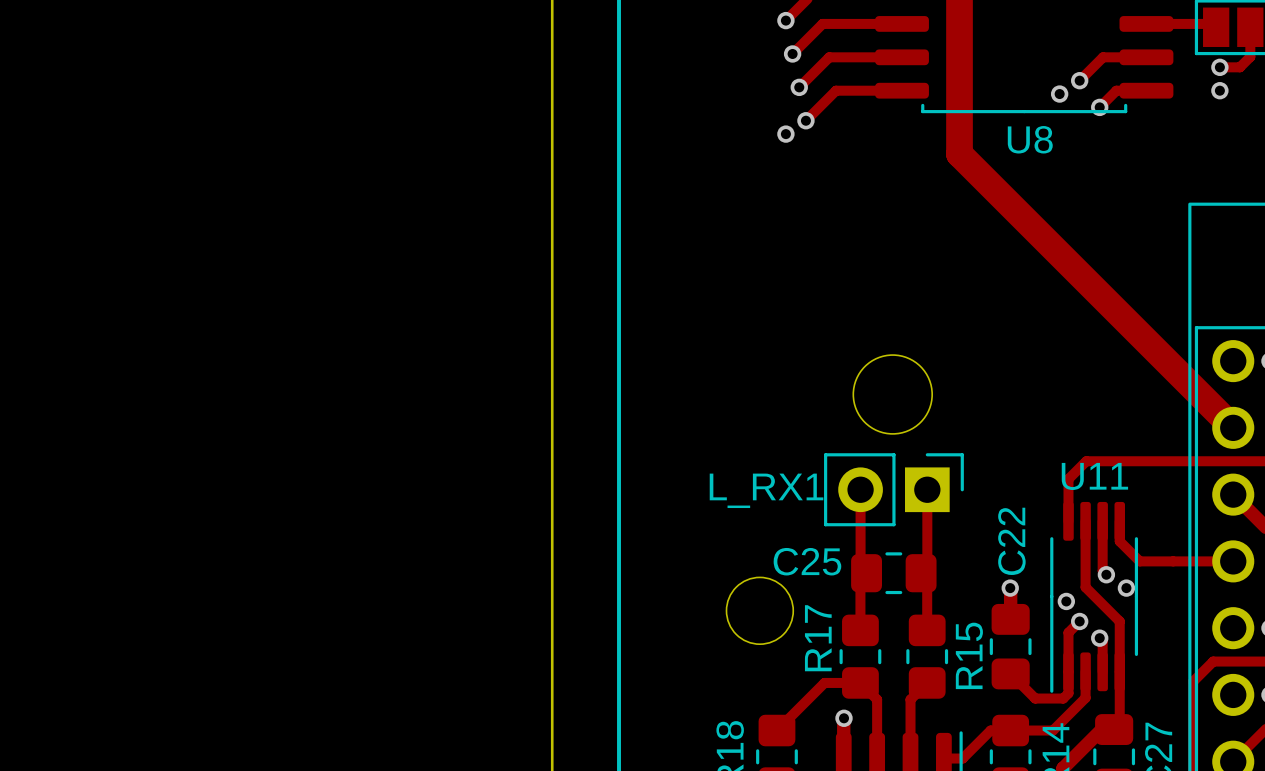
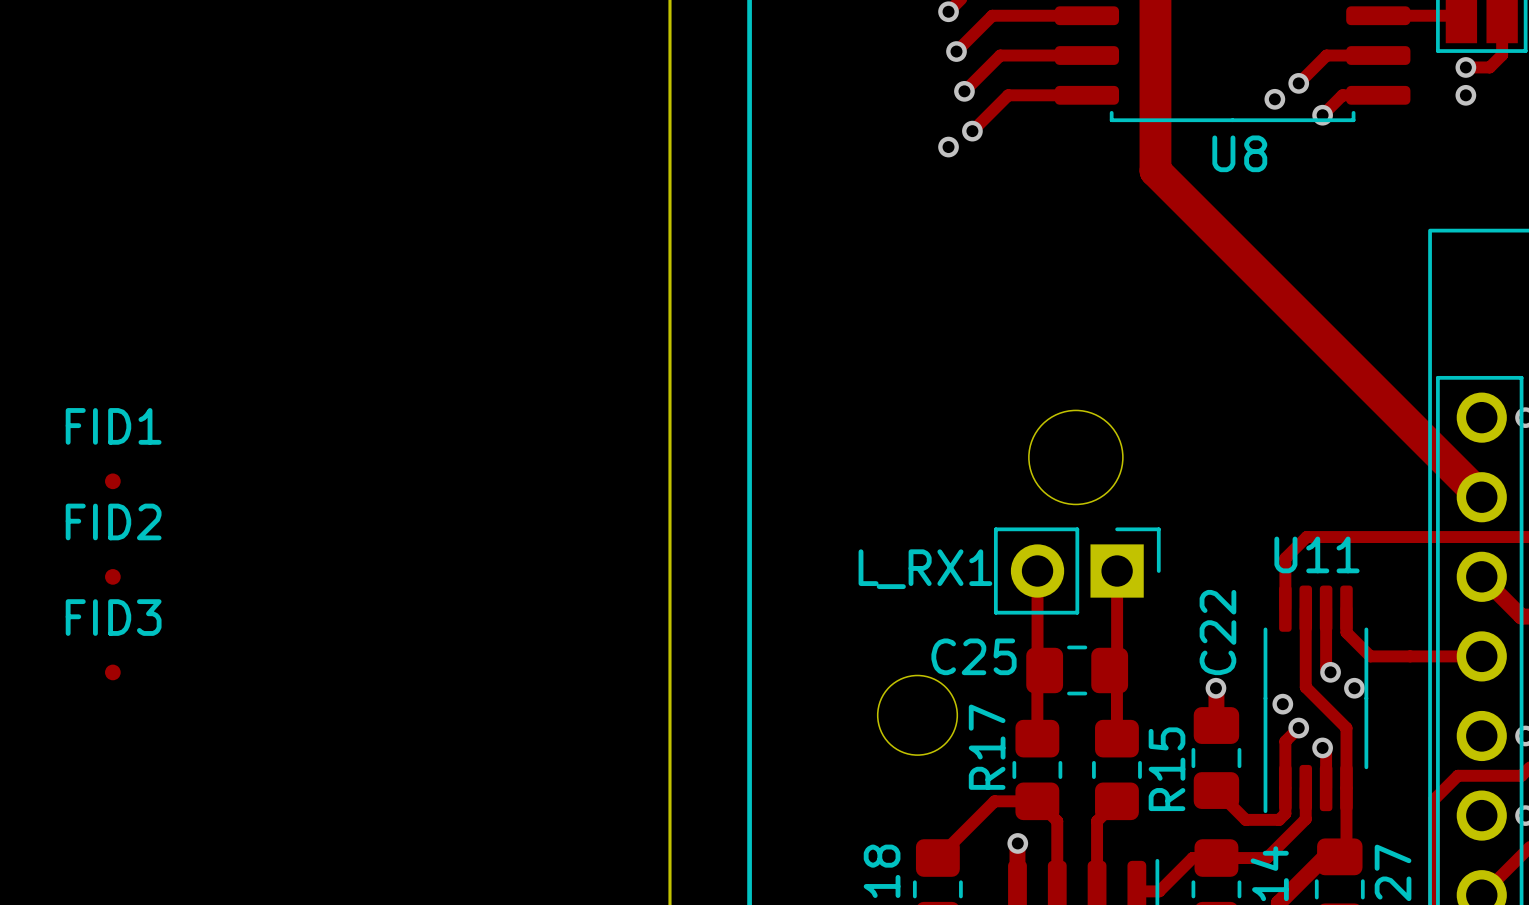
FID1: none -> (112, 481)
FID2: none -> (112, 576)
FID3: none -> (112, 672)

